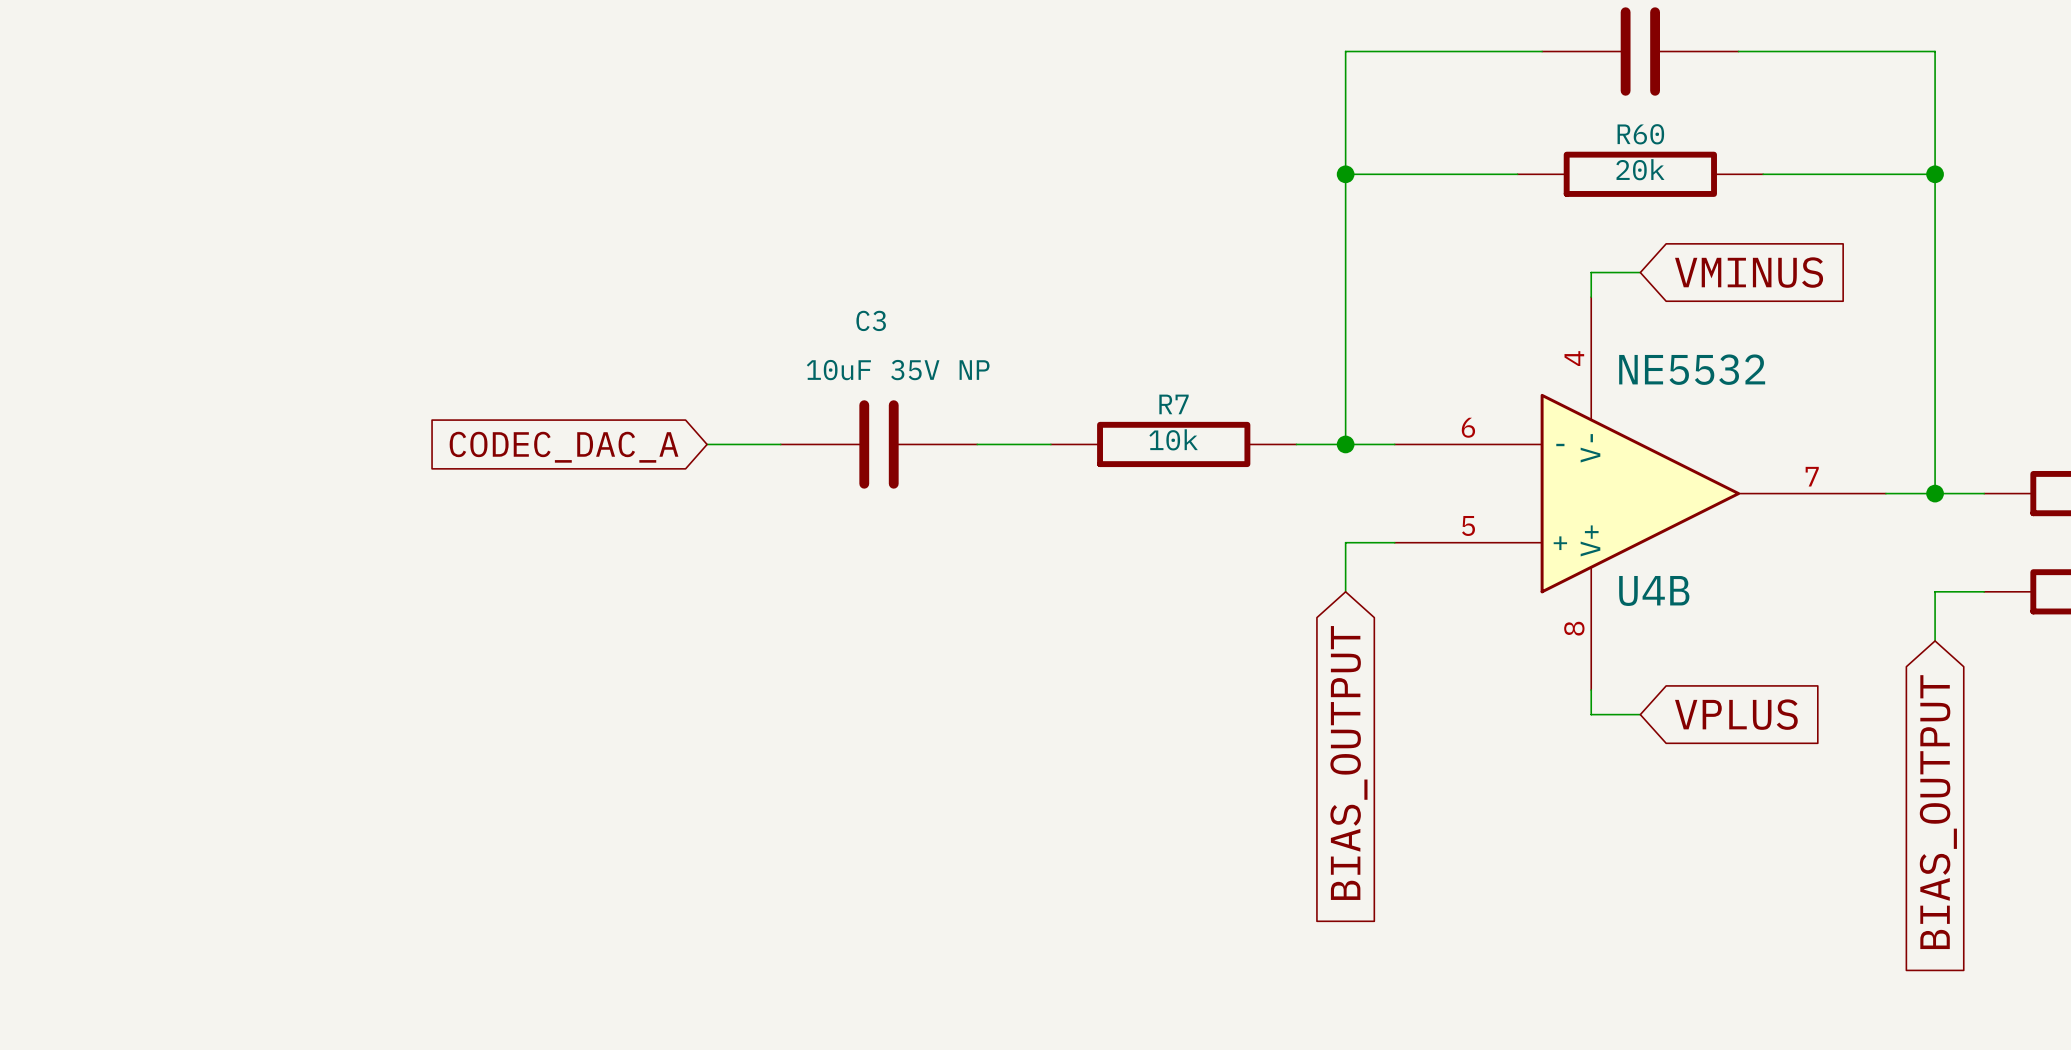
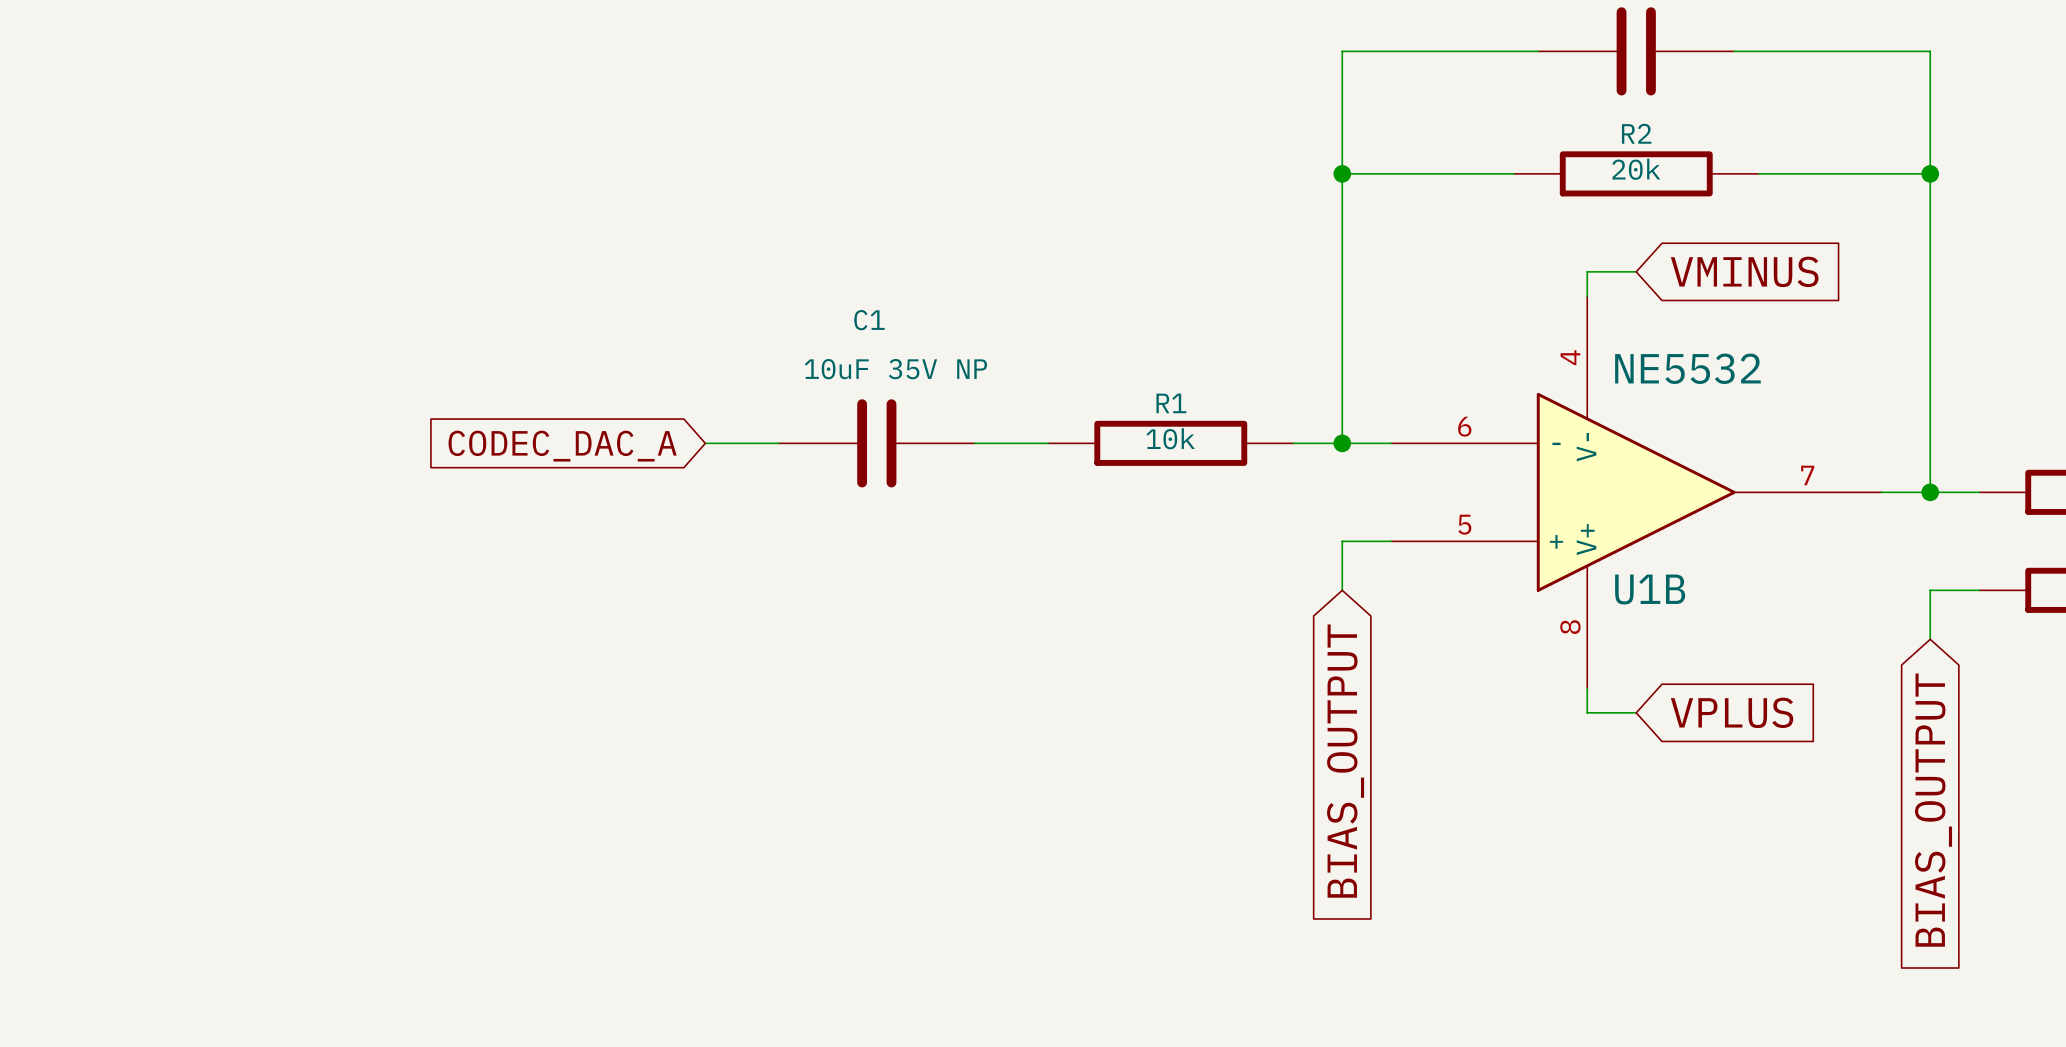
R60 name: R60 (1640, 134) -> R2 (1636, 133)
C3 name: C3 (871, 320) -> C1 (869, 320)
R7 name: R7 (1174, 404) -> R1 (1171, 403)
U4B name: U4B (1654, 590) -> U1B (1650, 589)

